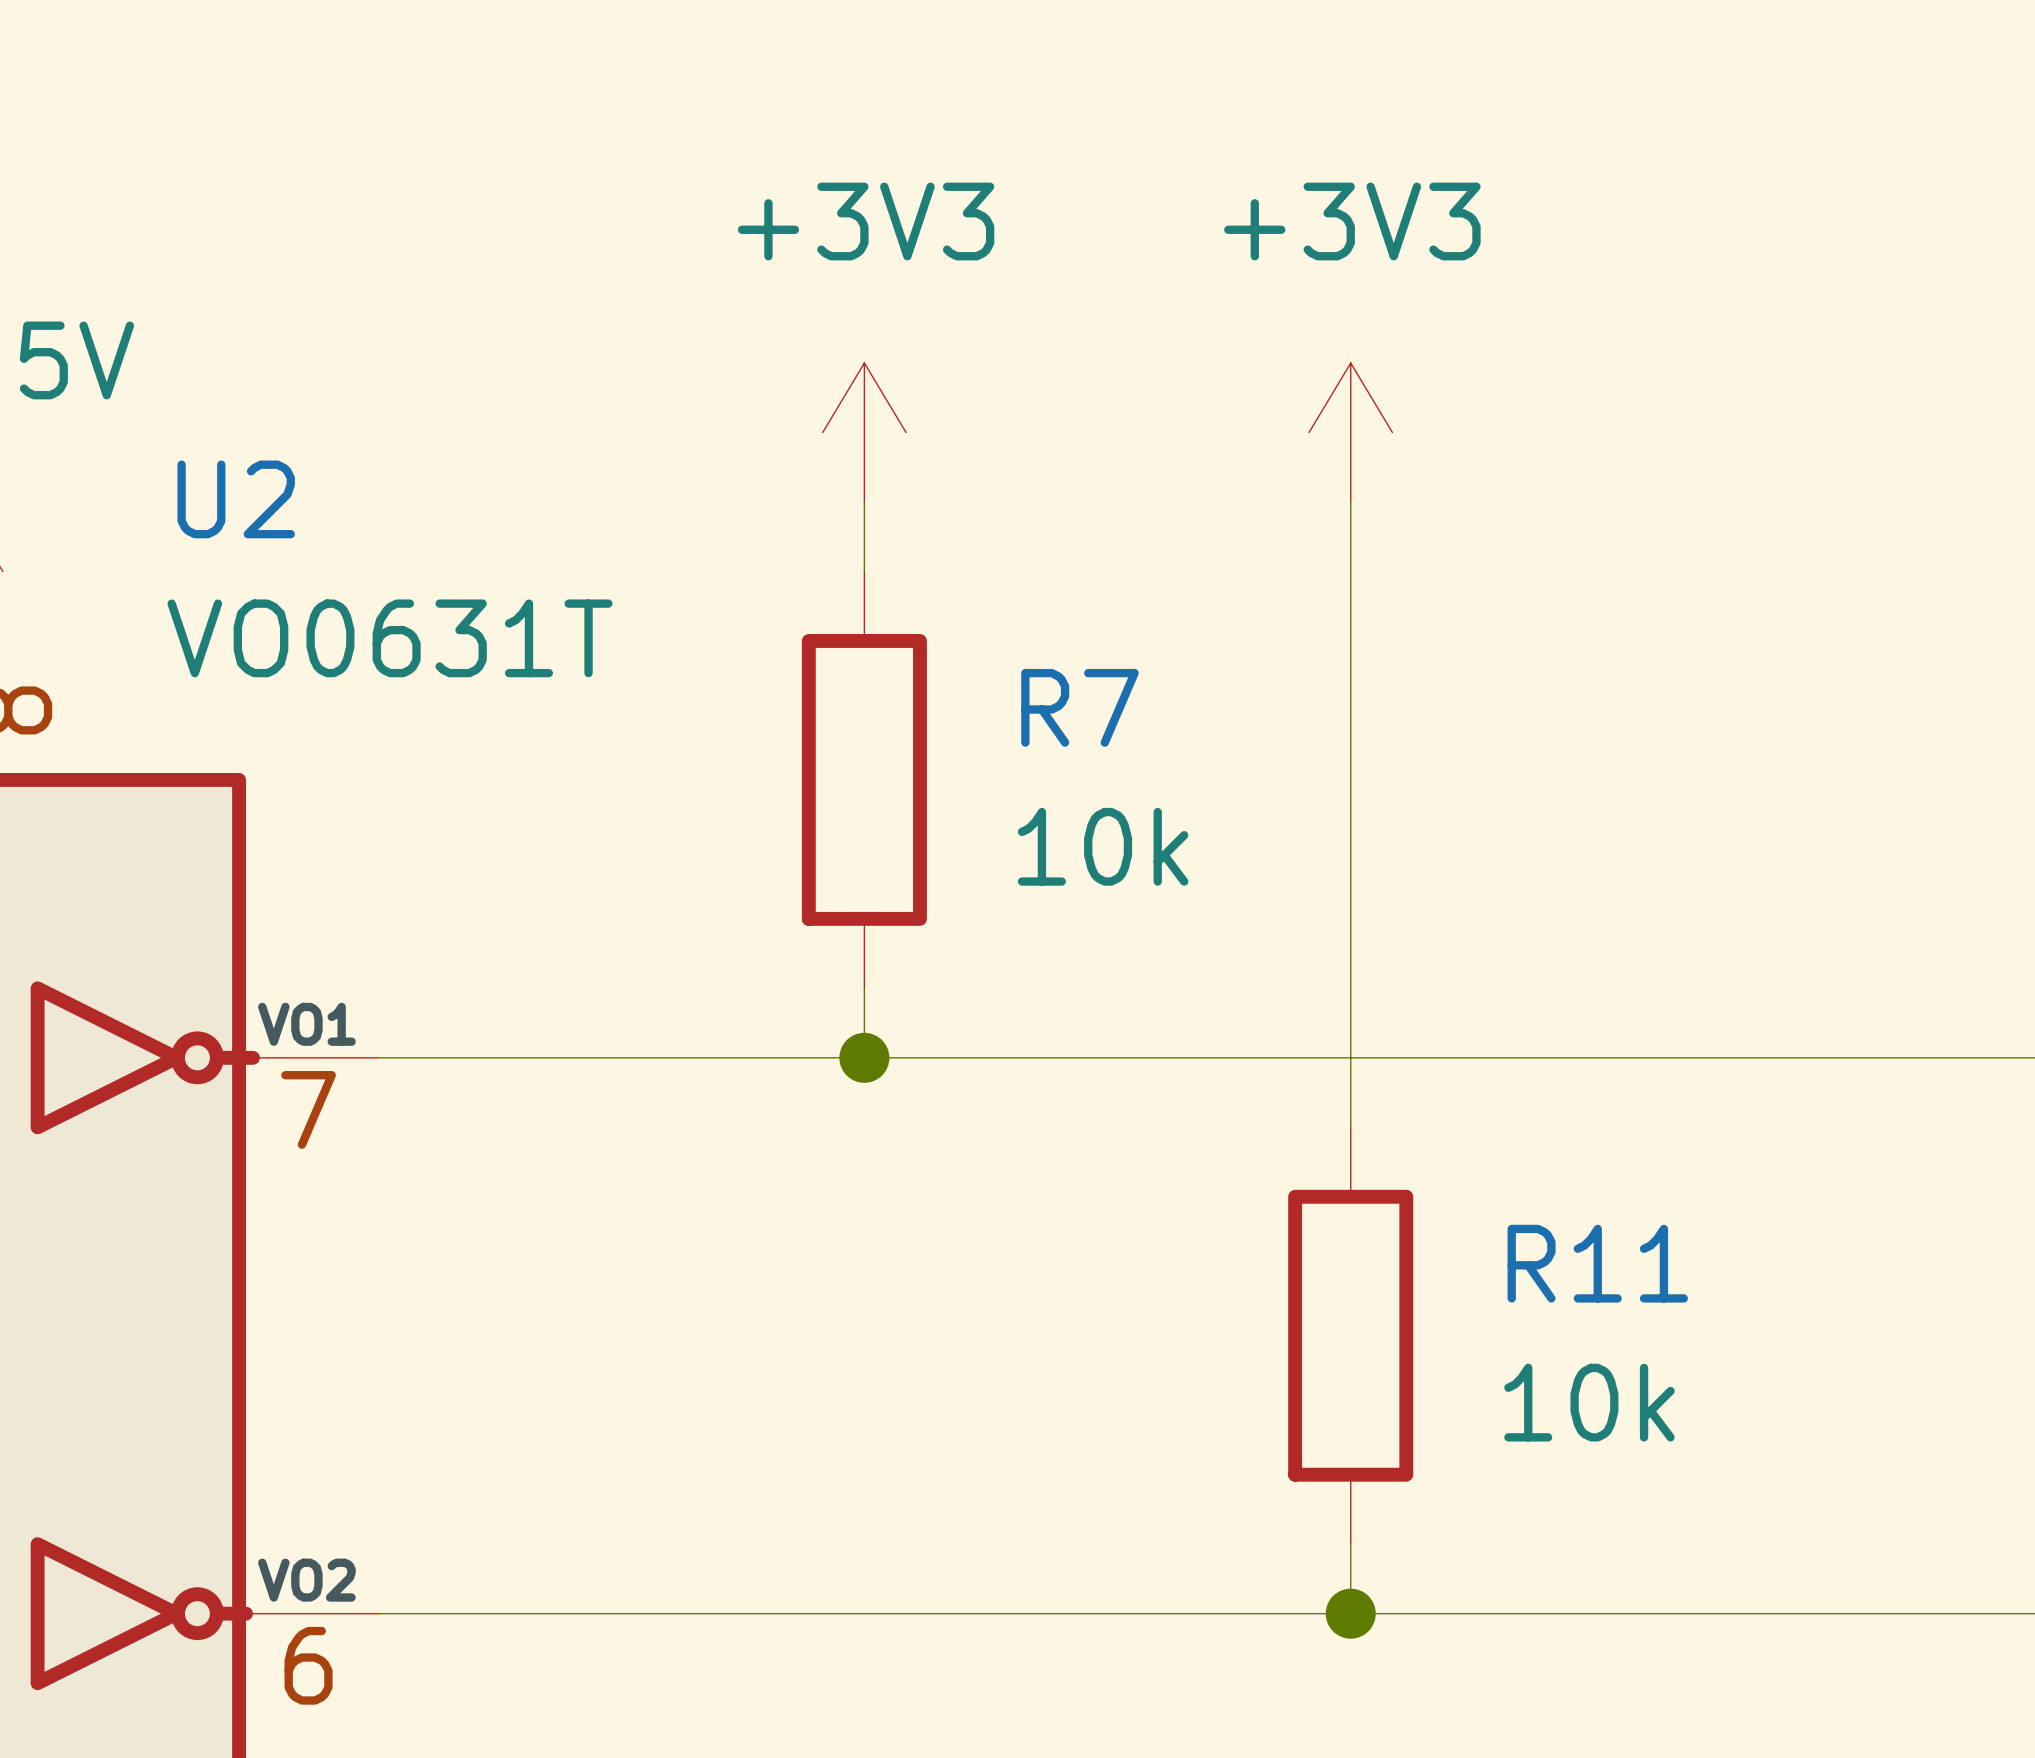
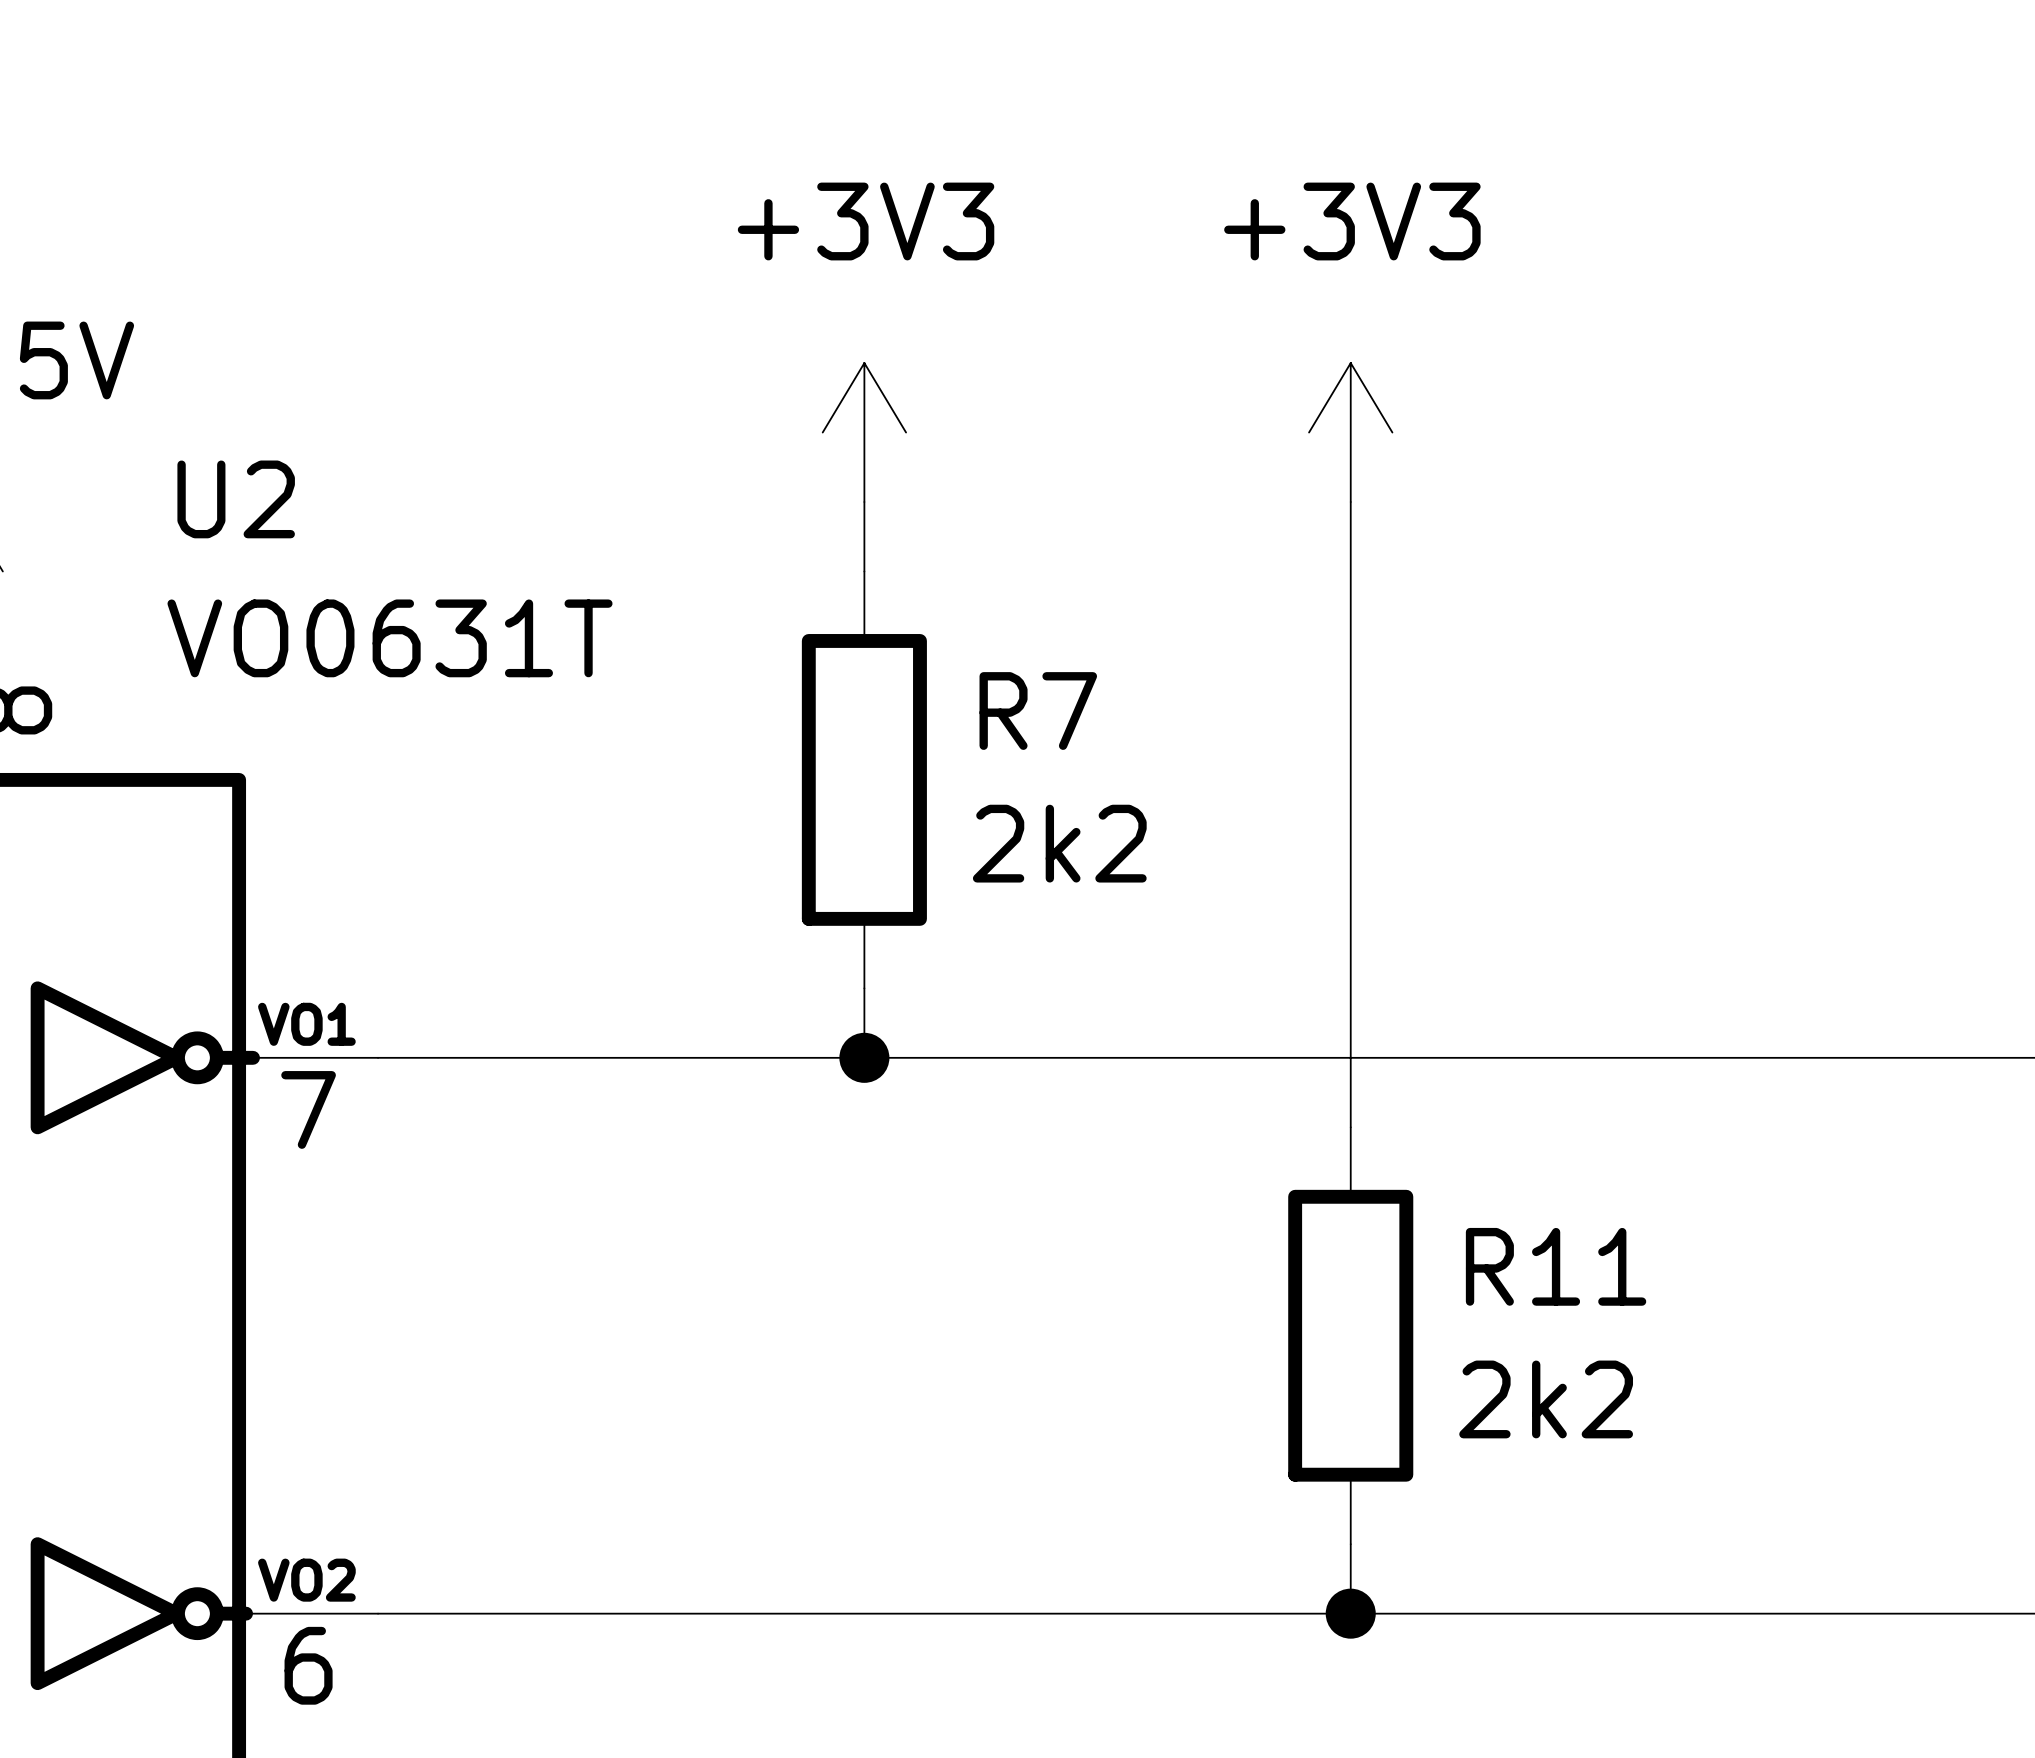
R7 name position: R7 (1079, 707) -> R7 (1038, 711)
R7 value: 10k (1103, 846) -> 2k2 (1059, 843)
R11 name position: R11 (1597, 1263) -> R11 (1556, 1266)
R11 value: 10k (1589, 1402) -> 2k2 (1546, 1399)

